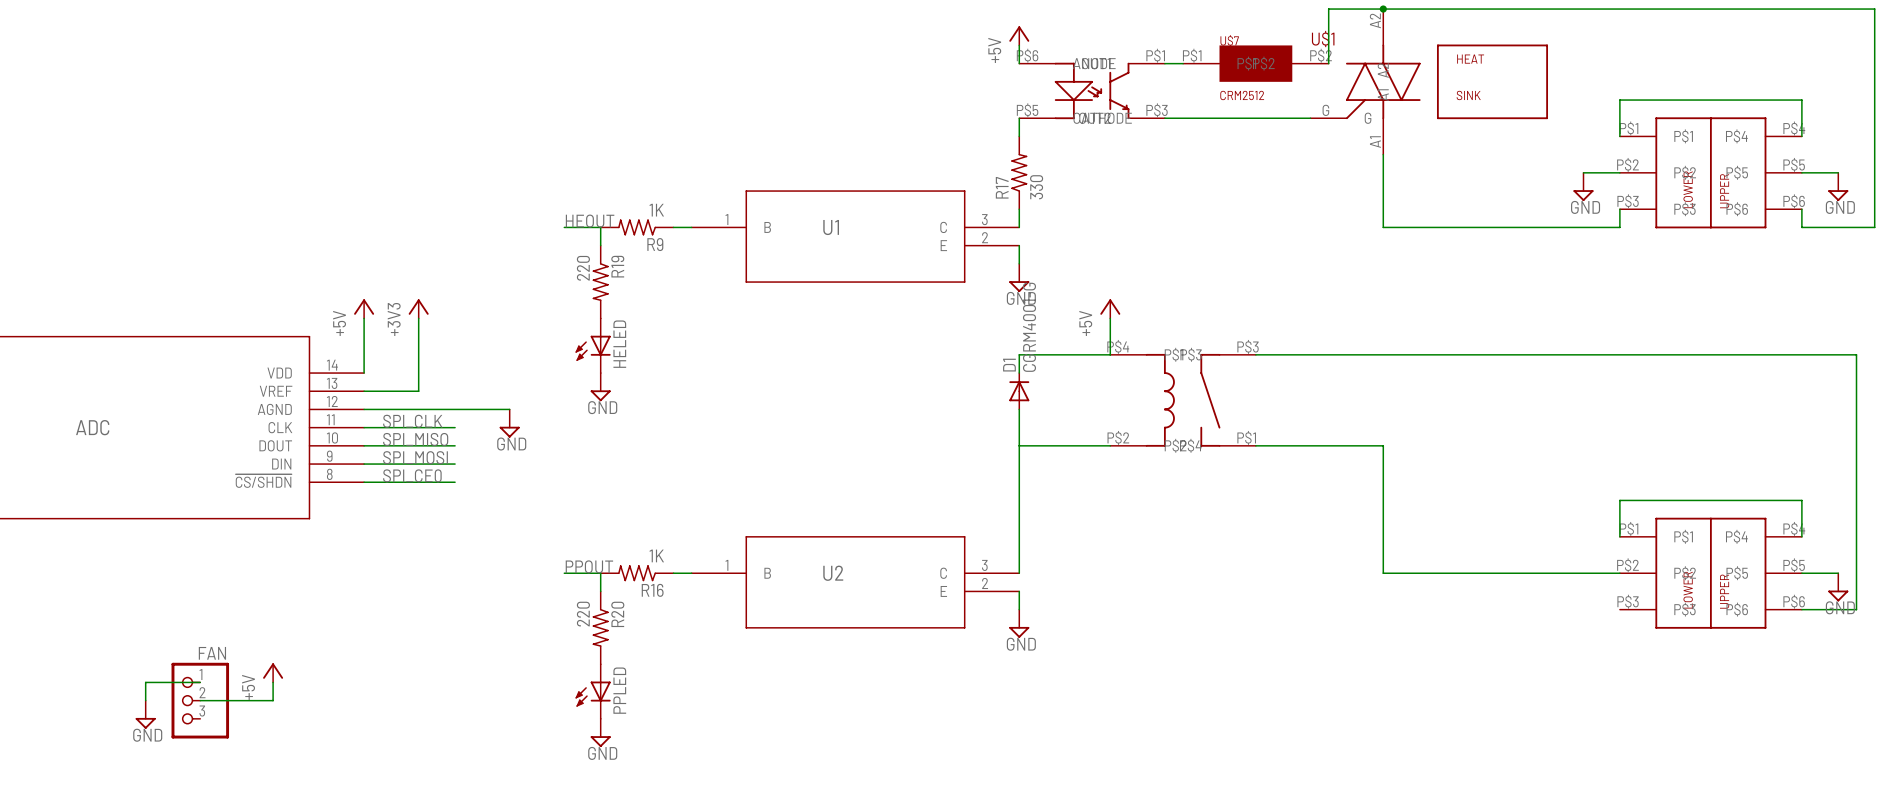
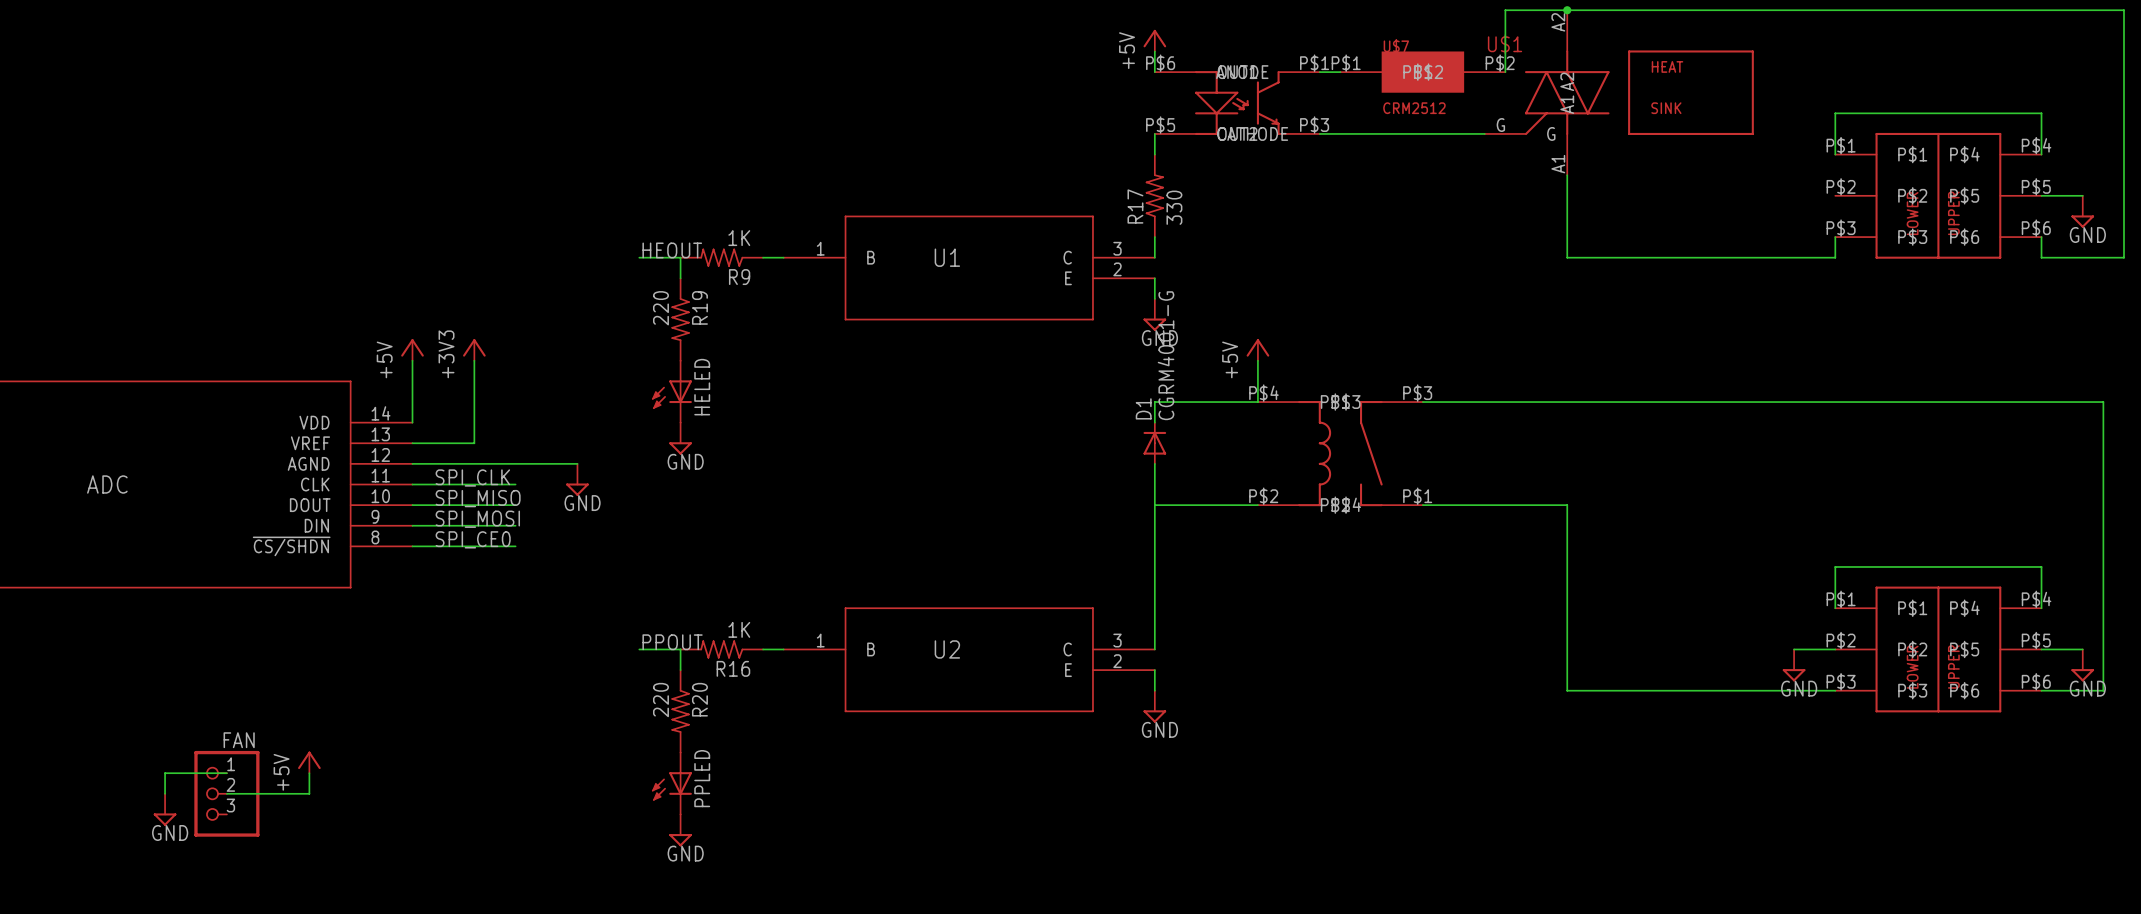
wire: (1583, 172) (1619, 172) -> none
power symbol: GND (1583, 186) -> none
wire: (1383, 573) (1583, 573) -> (1567, 649) (1567, 690) (1835, 690)
power symbol: none -> GND (1794, 665)

